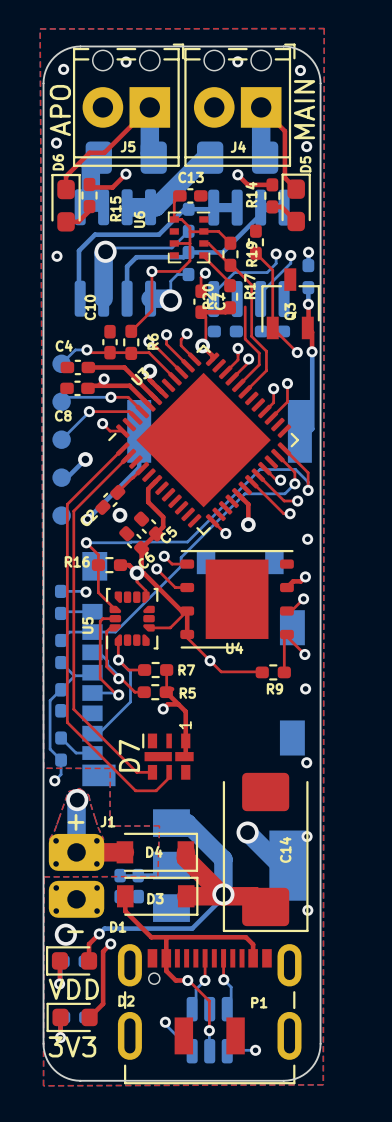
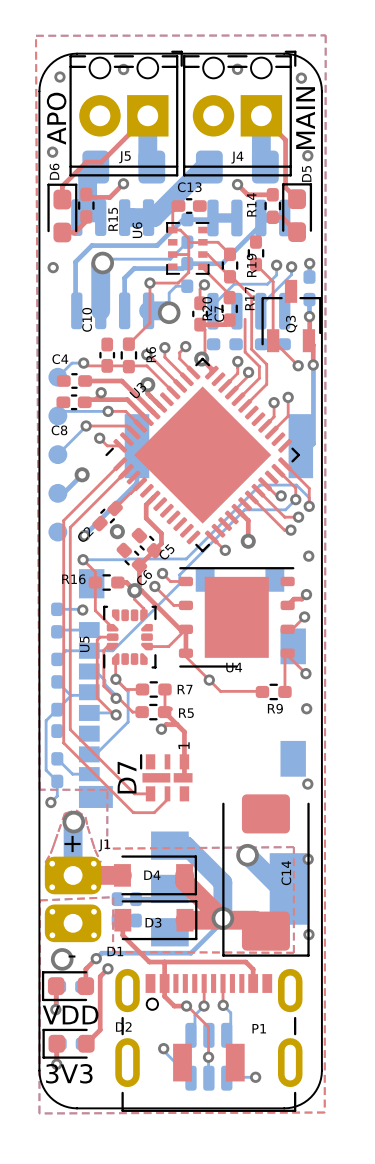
top zone outline: (110, 826) (159, 825) (157, 876) (44, 876) -> (107, 848) (293, 847) (293, 952) (113, 952) (113, 897) (39, 900)

